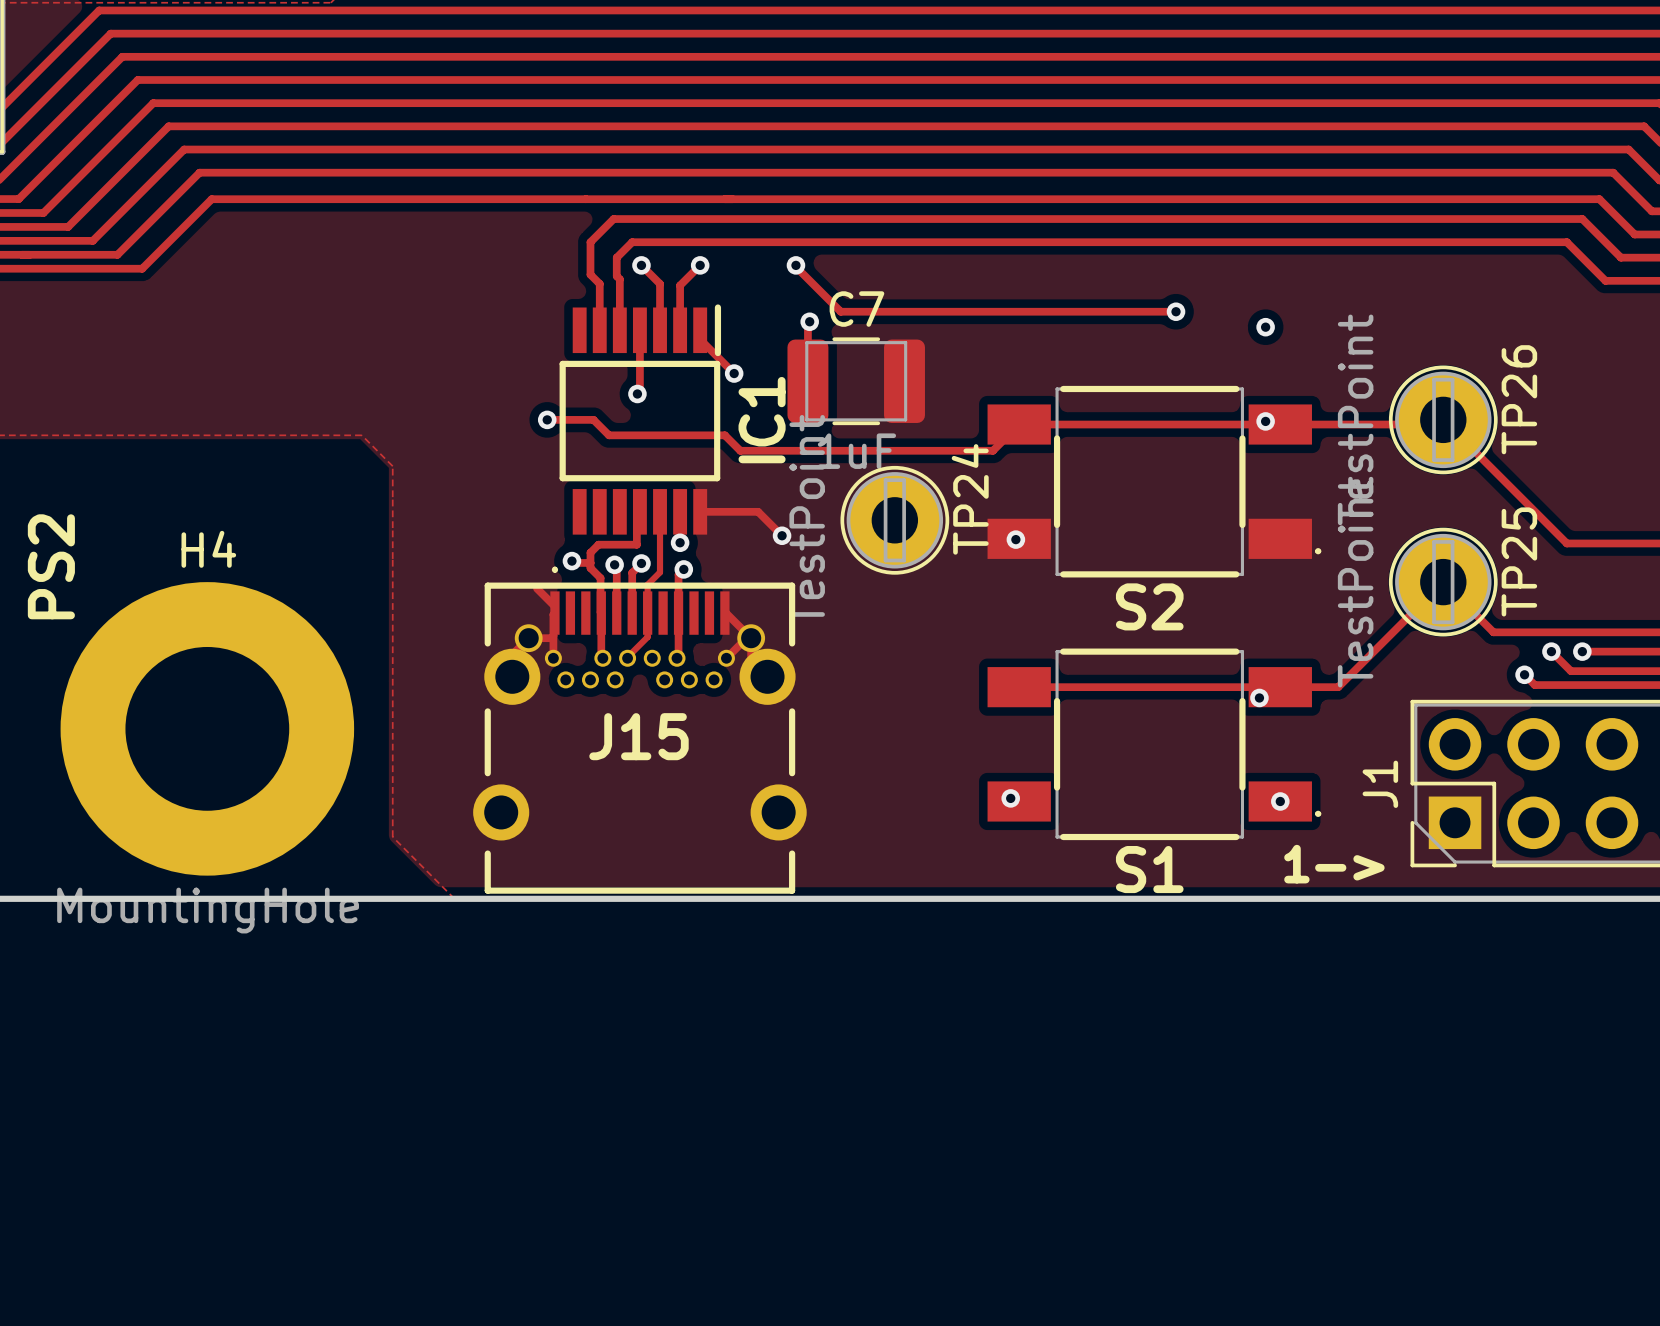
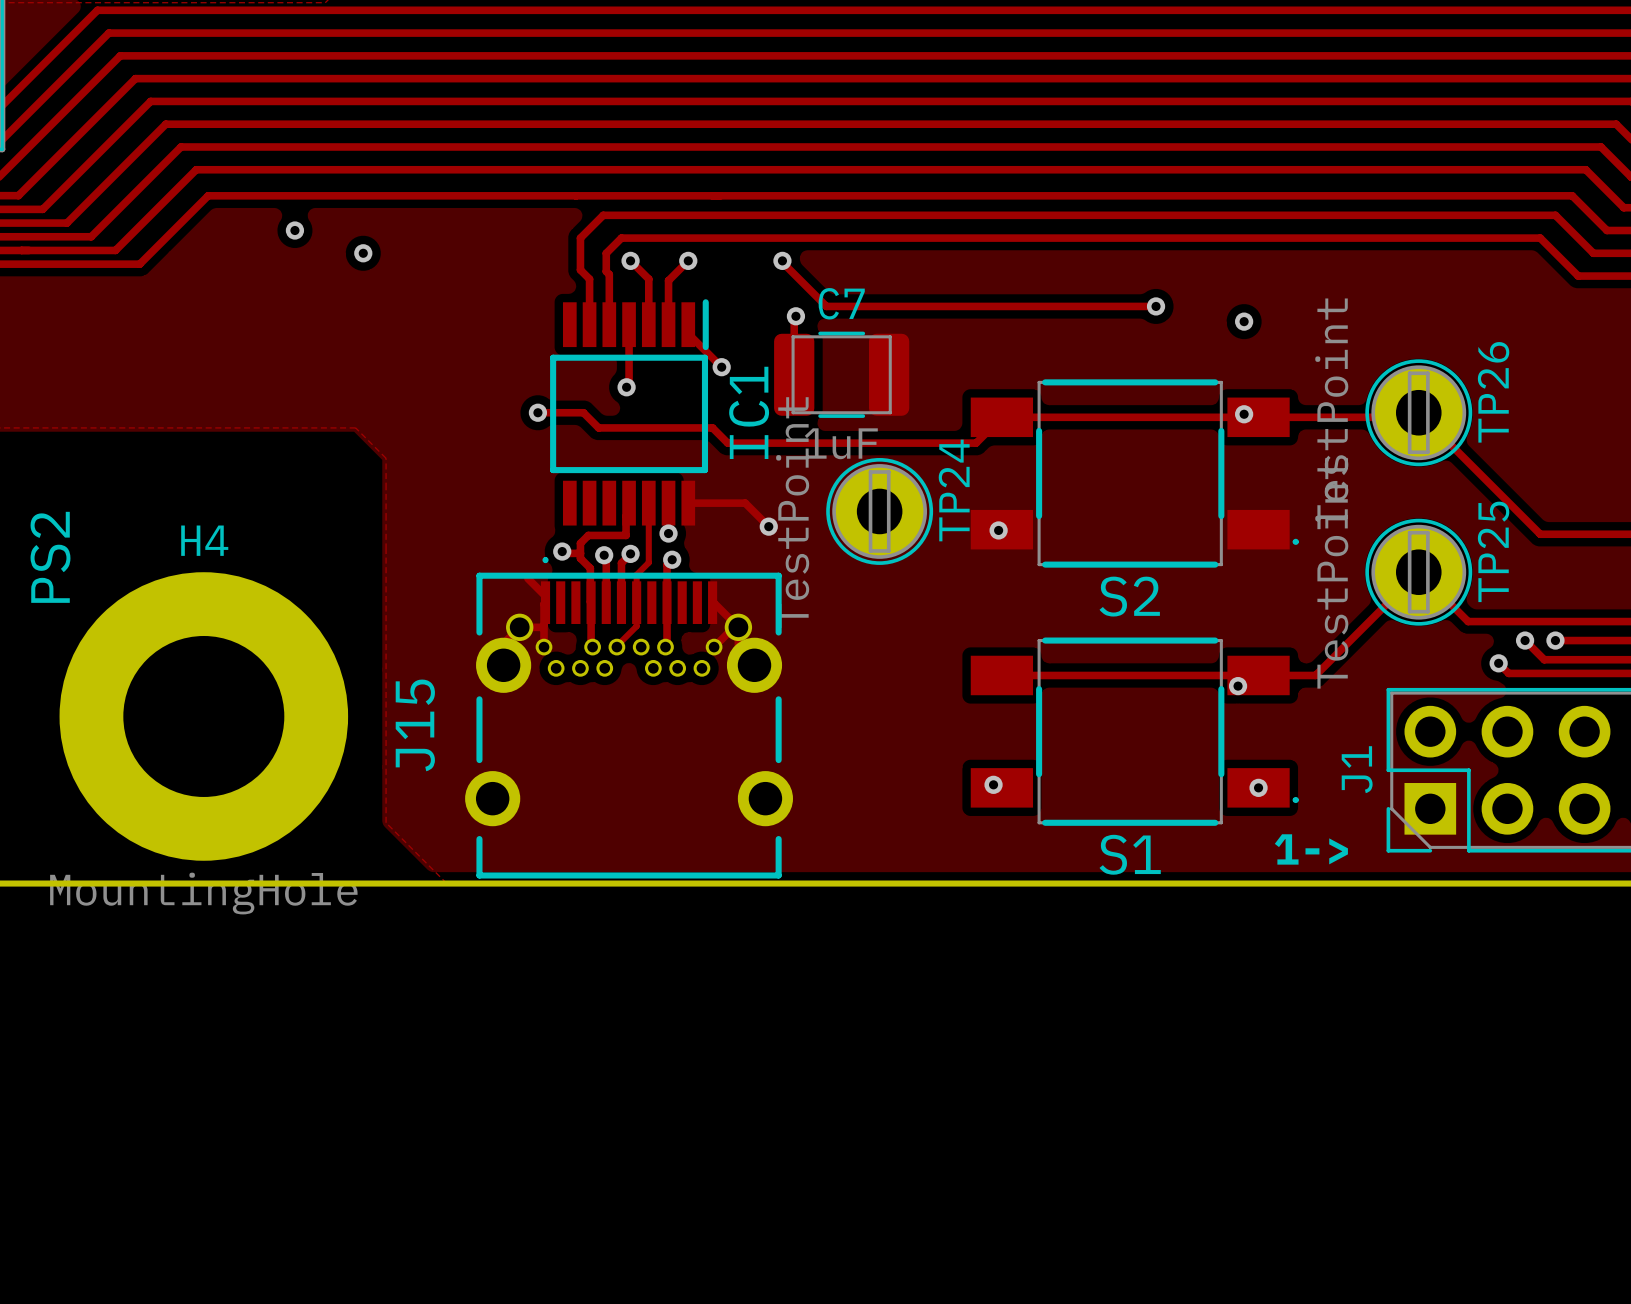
via: none -> (294, 230)
via: none -> (363, 253)
J15 name rotation: 0° (638, 736) -> 90° counterclockwise (415, 725)
J15 name position: J15 (638, 736) -> J15 (415, 725)

